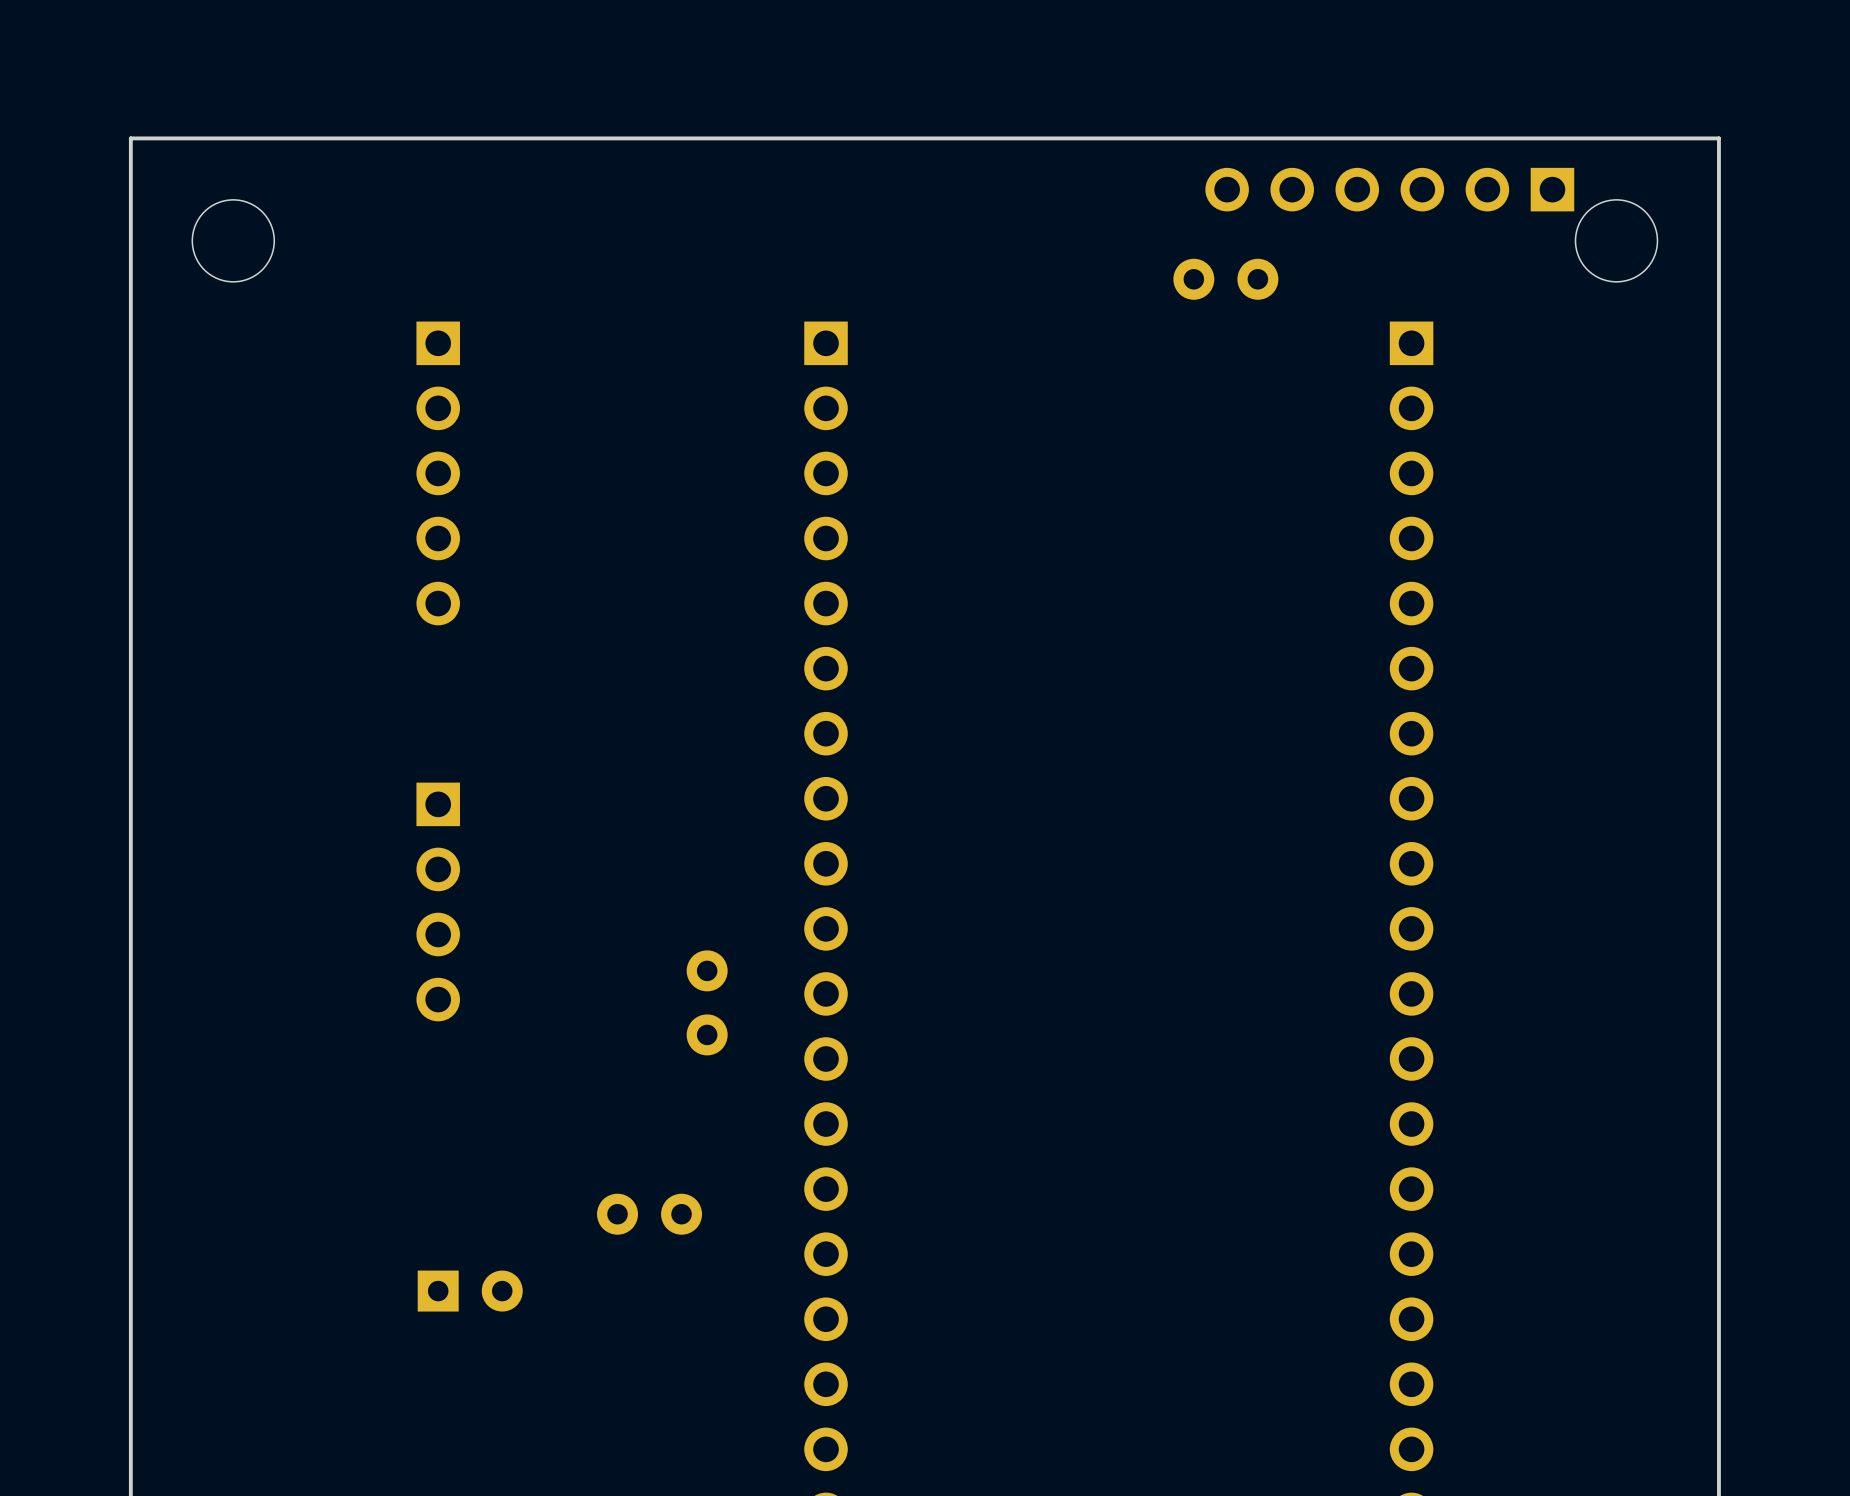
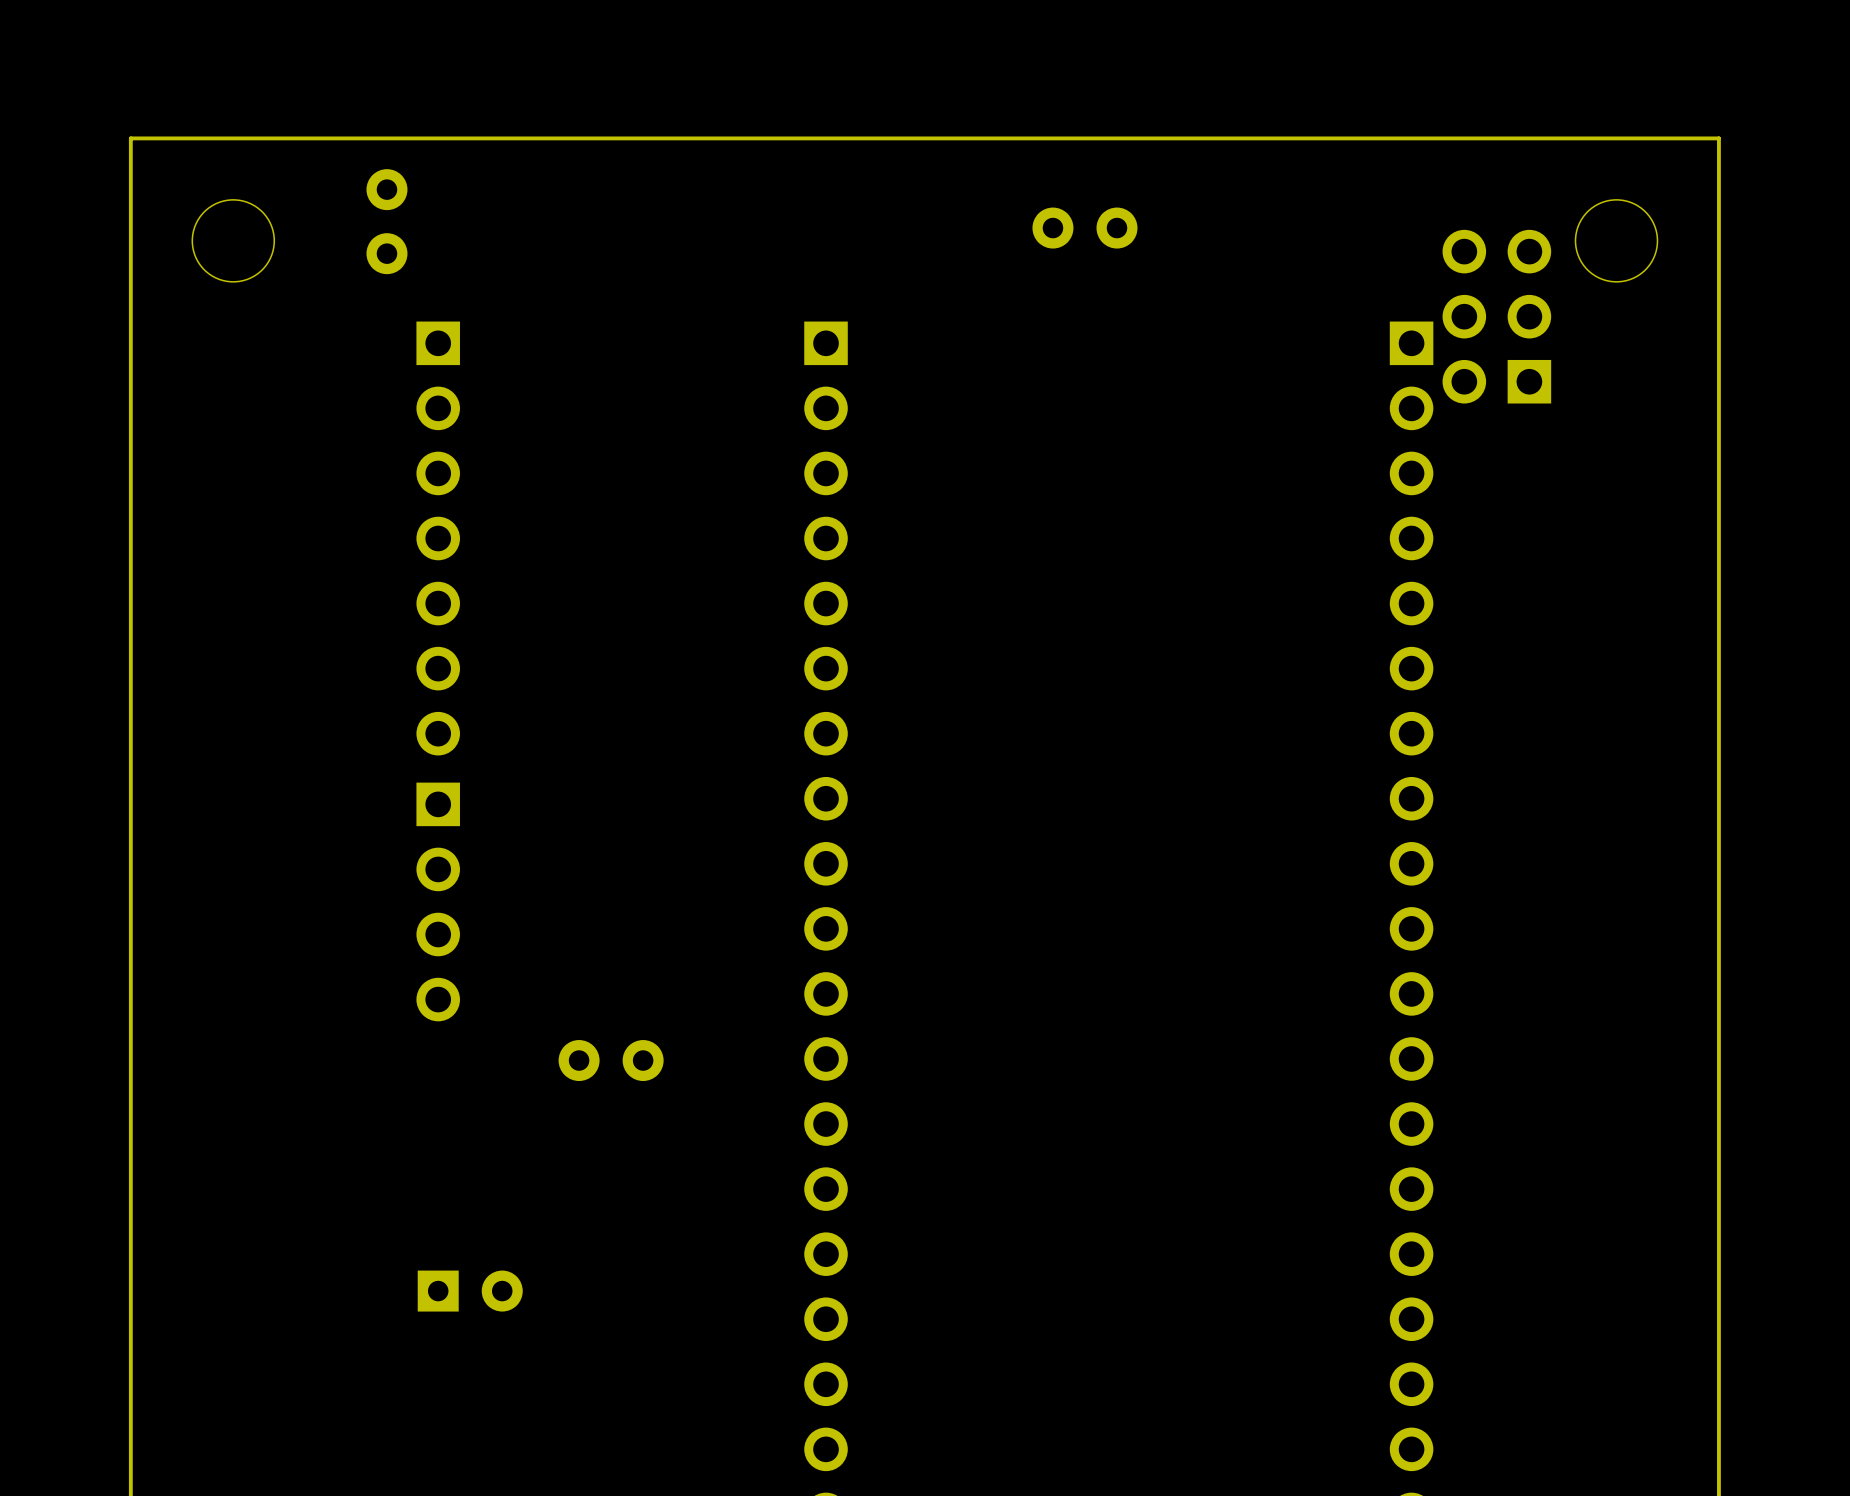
part: (1389, 189) -> none
part: none -> (386, 221)
part position: (1225, 279) -> (1084, 228)
part: none -> (1496, 316)
part: none -> (438, 538)
part: (707, 1002) -> none
part: none -> (611, 1060)
part: (649, 1214) -> none

